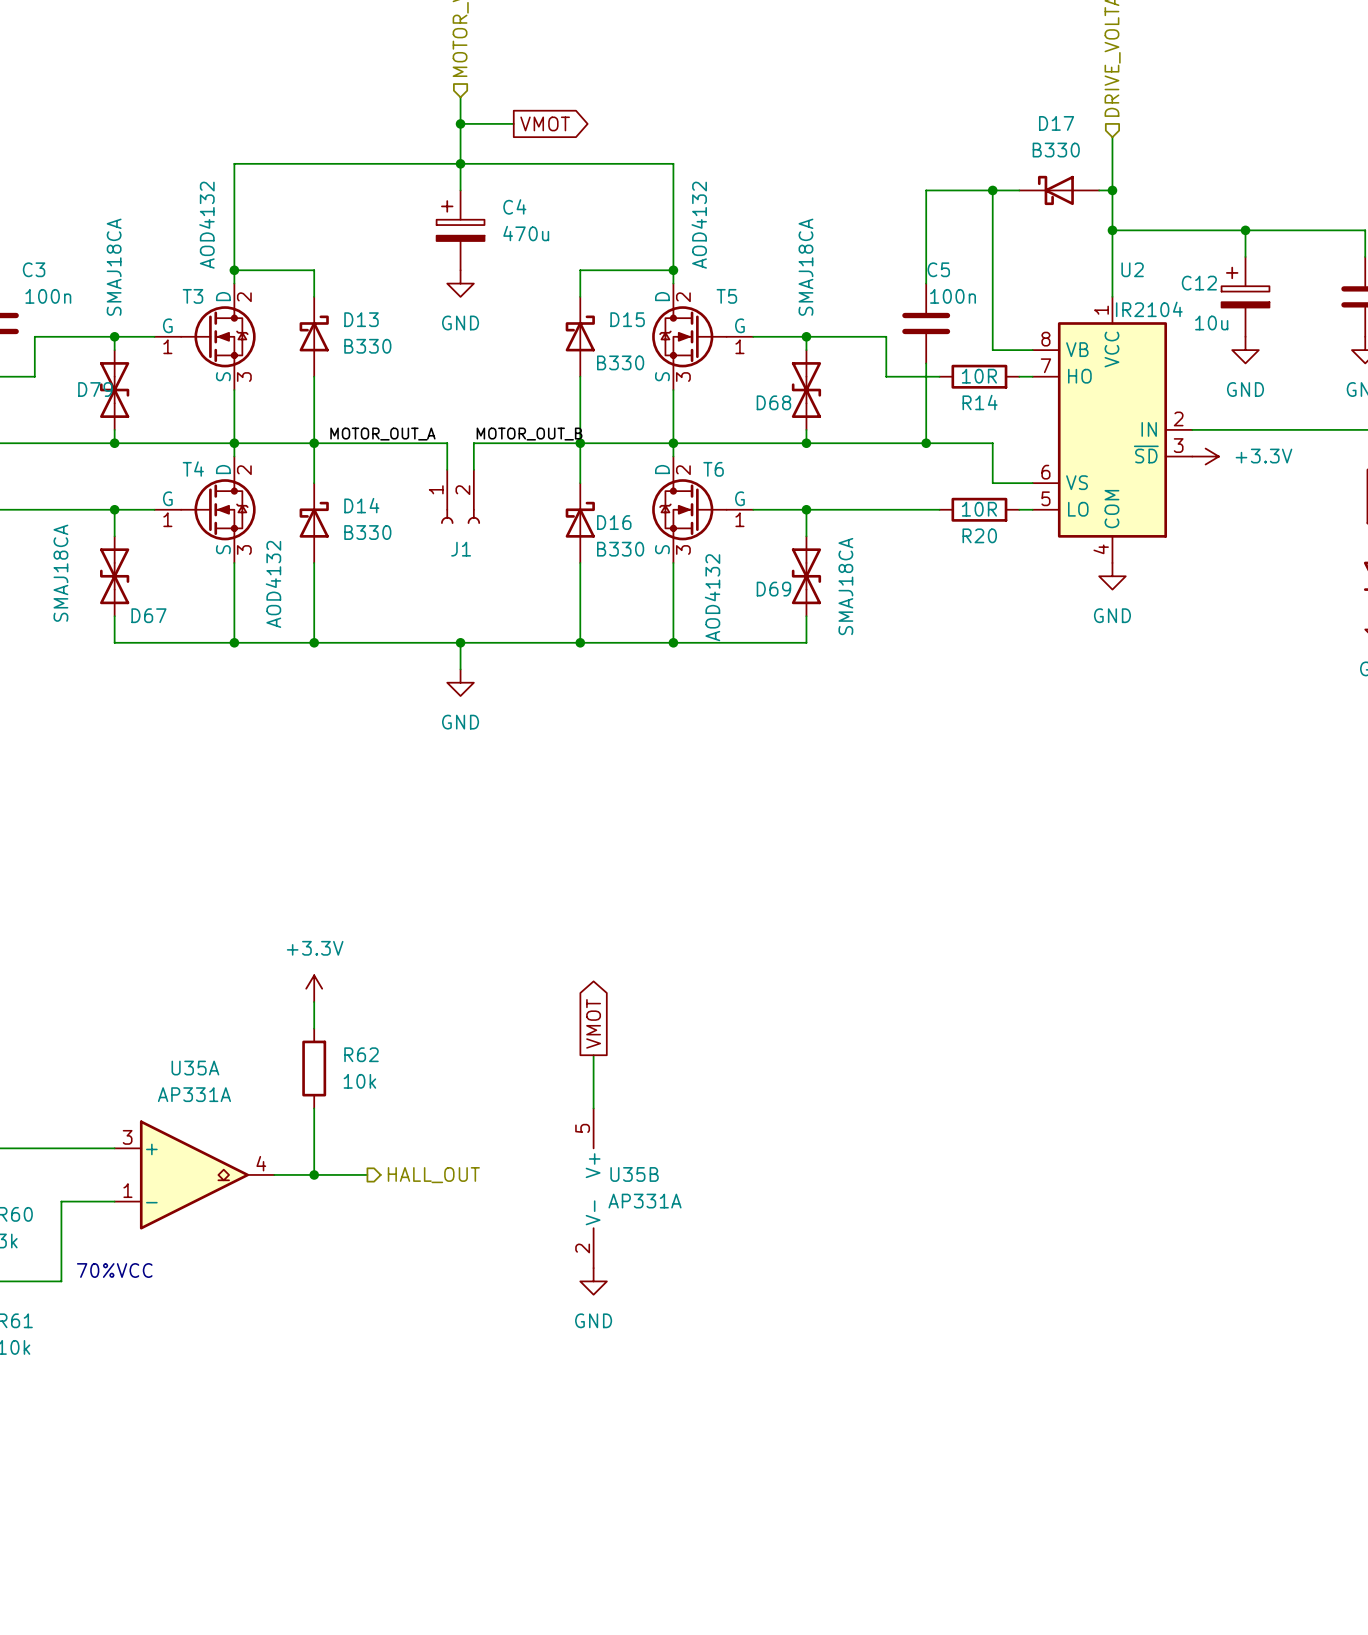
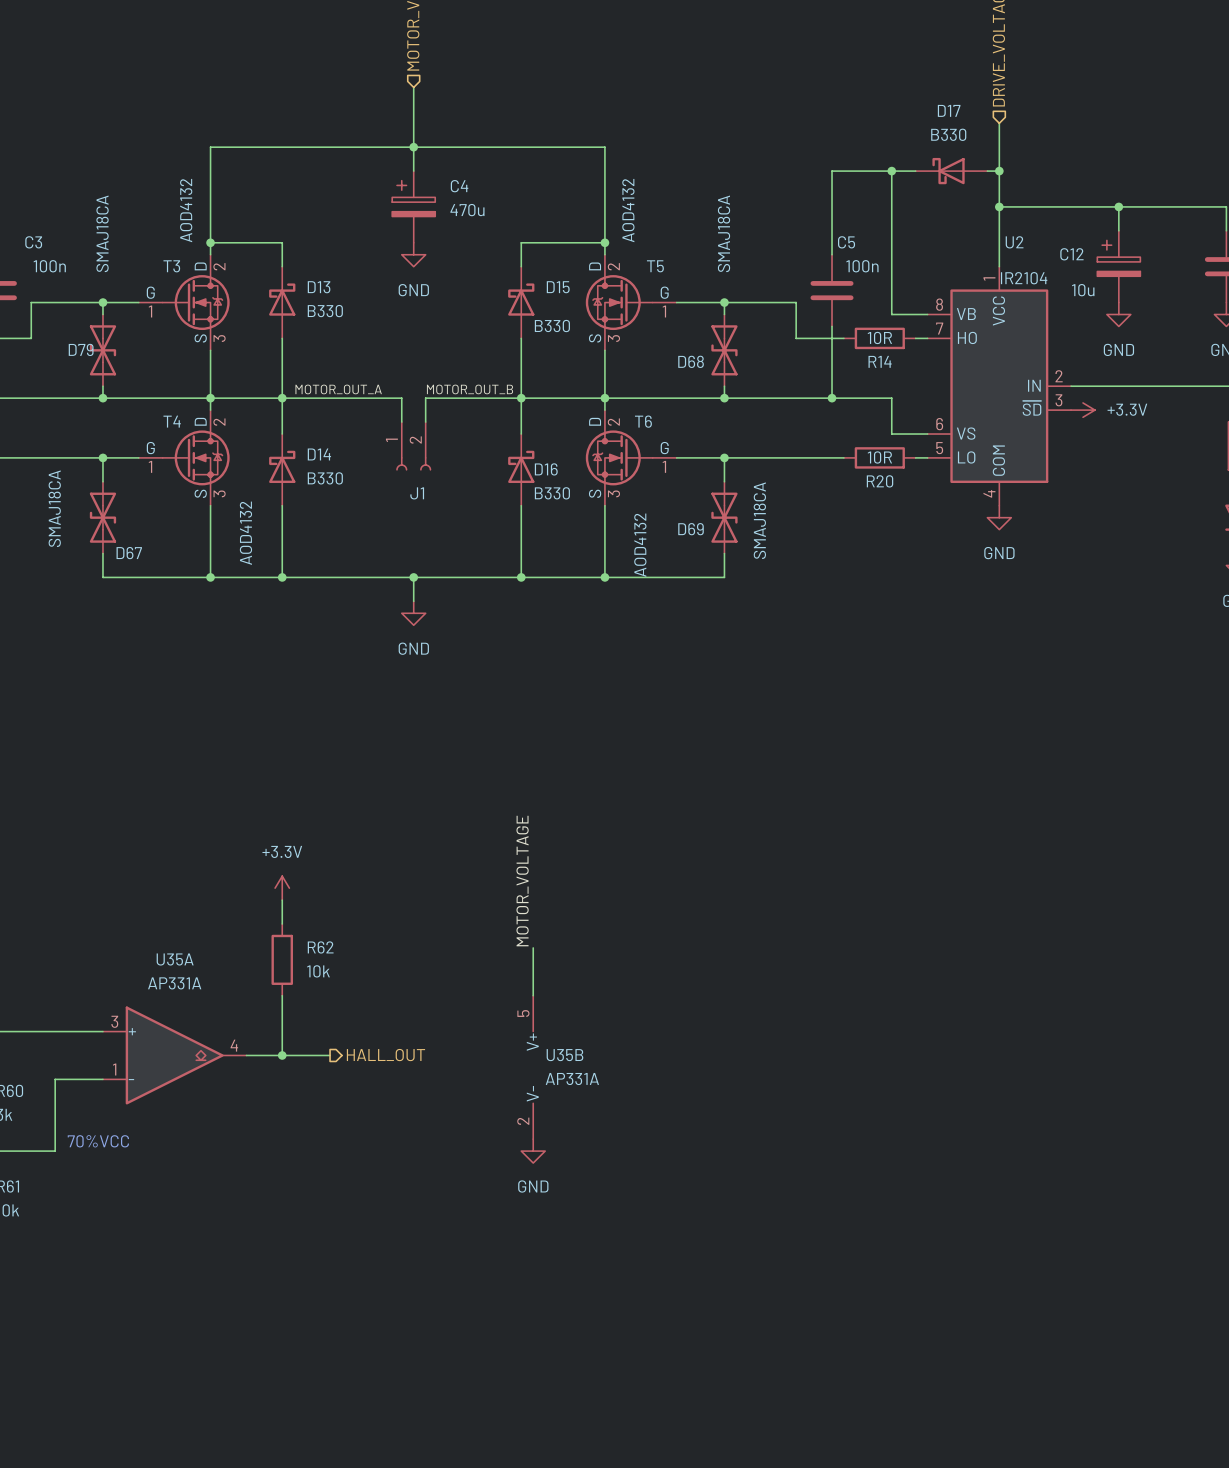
wire: (460, 123) (513, 123) -> none
junction: (460, 123) -> none
global label: VMOT (545, 123) -> none
label: none -> MOTOR_VOLTAGE (522, 881)
global label: VMOT (593, 1023) -> none

